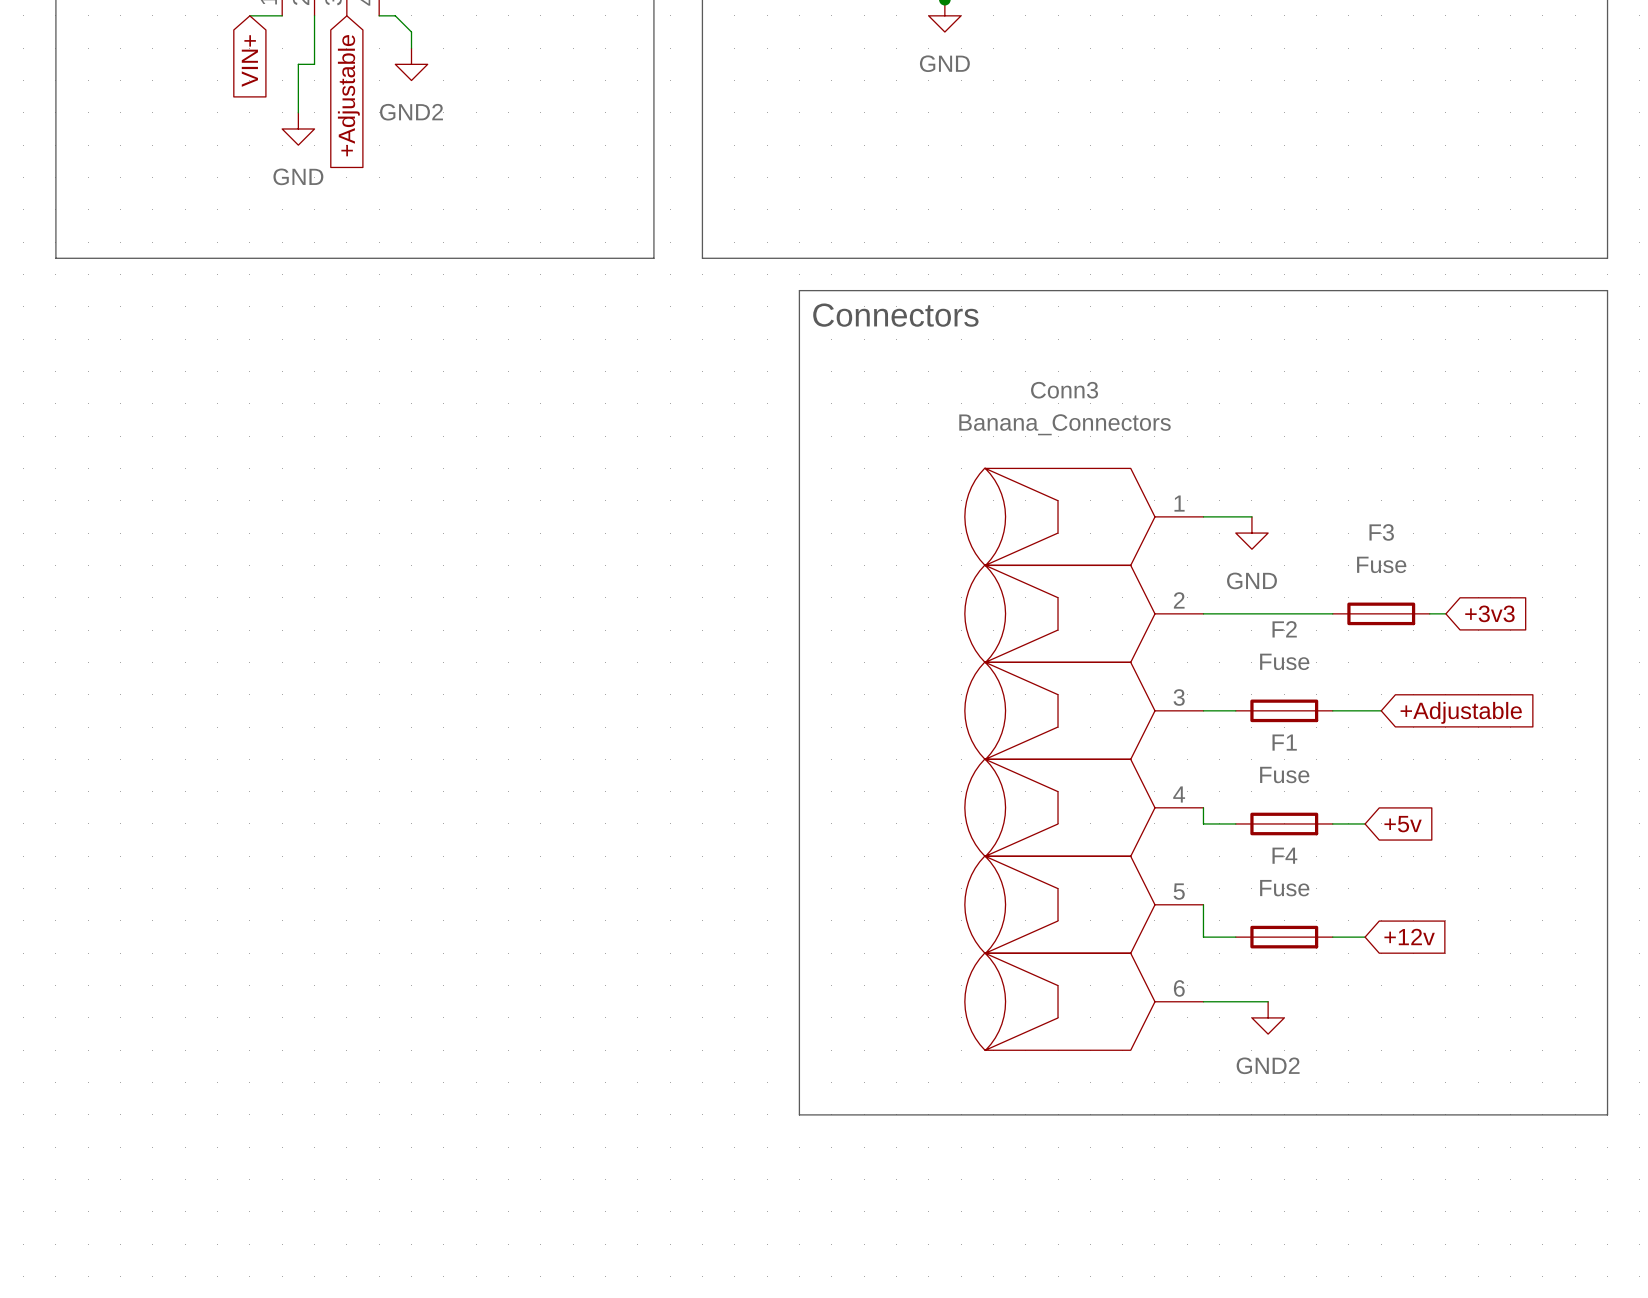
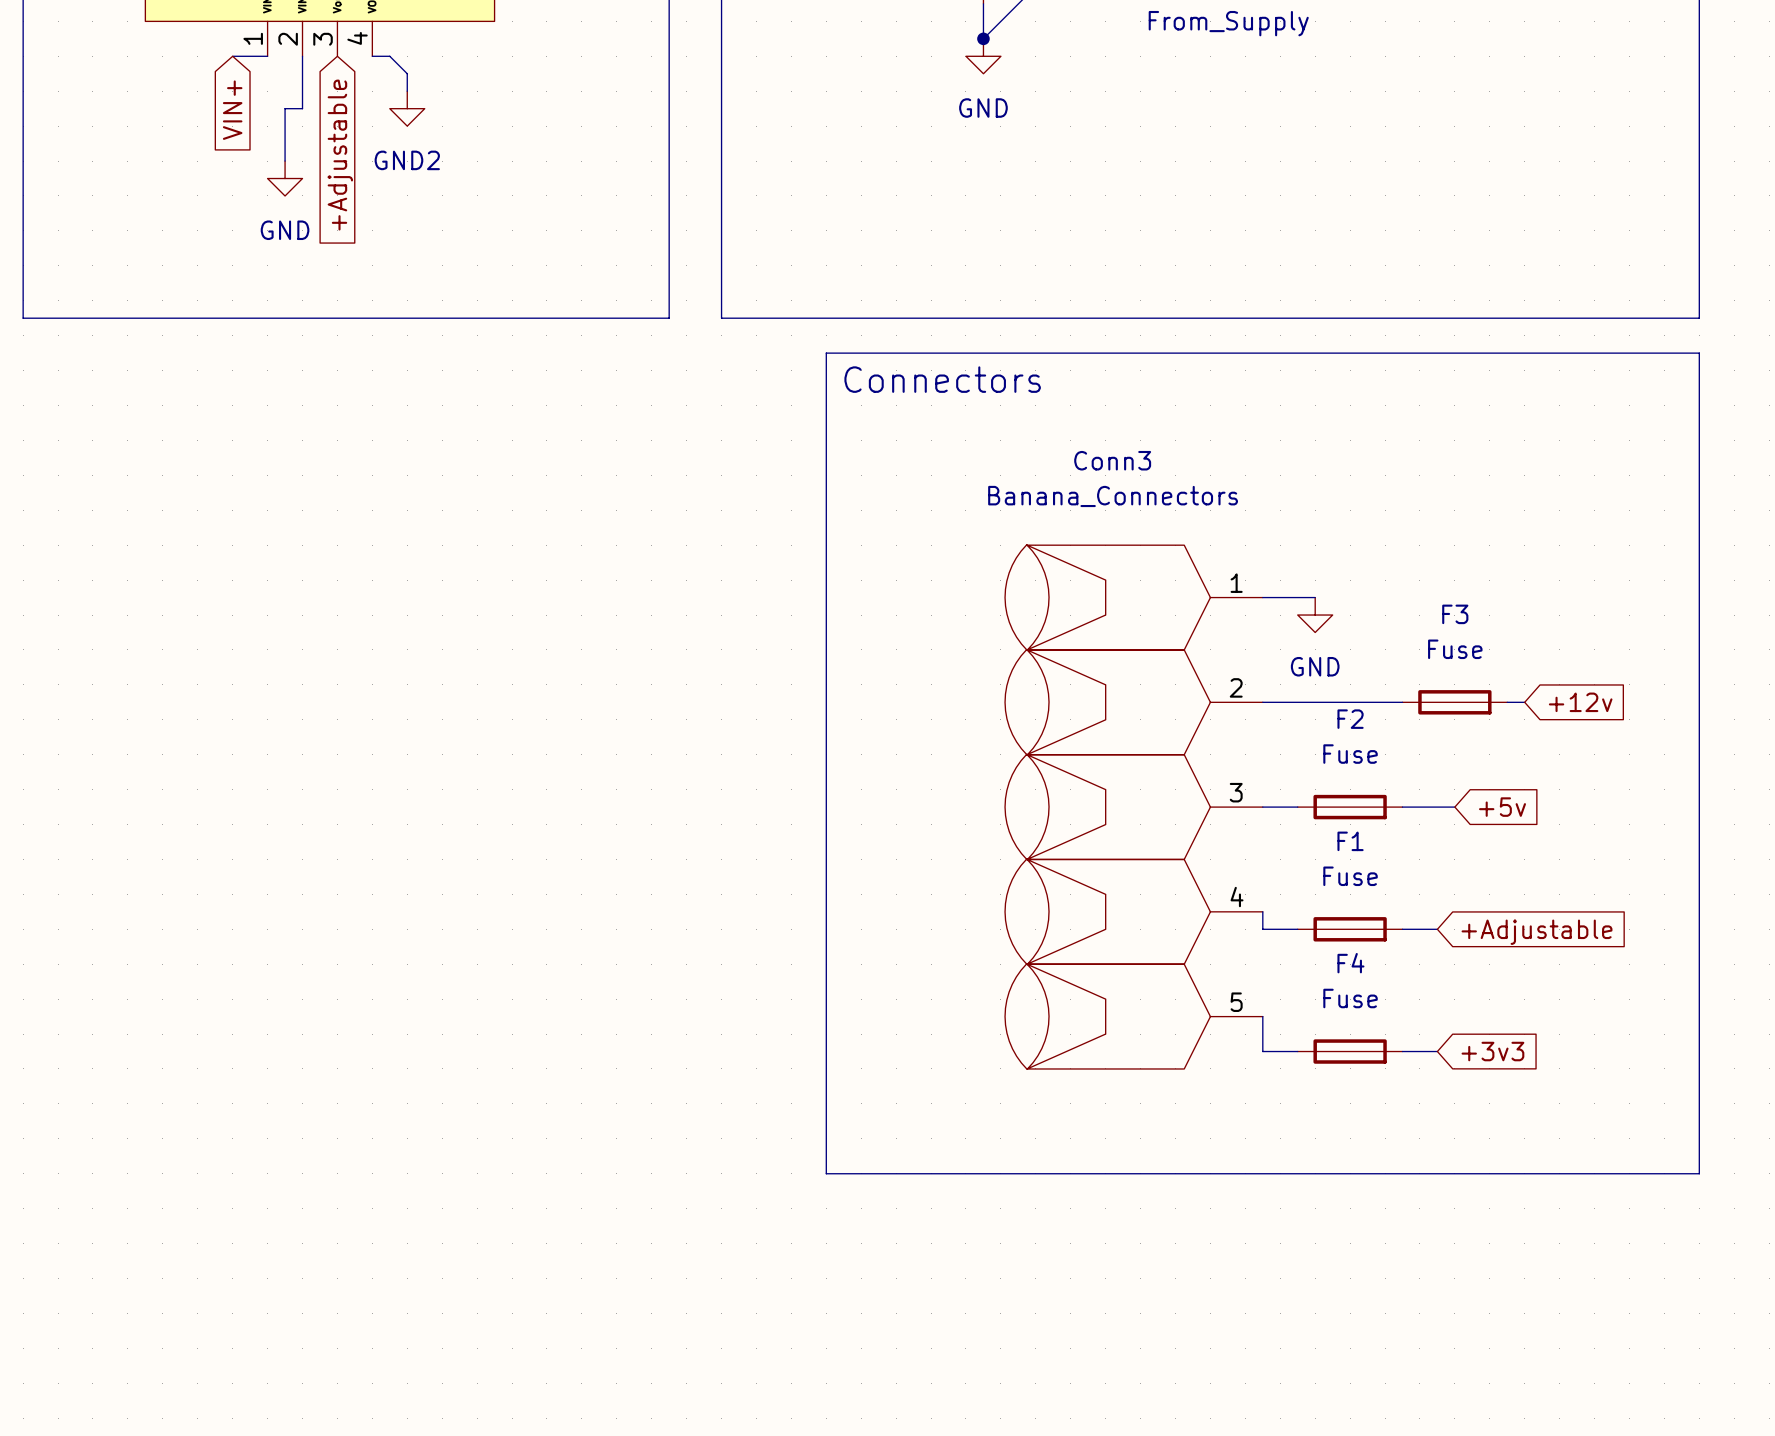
Conn3 symbol: [964, 468, 1204, 1051] -> [1005, 544, 1263, 1070]
global label: +3v3 (1489, 613) -> +12v (1580, 702)
global label: +Adjustable (1461, 712) -> +5v (1502, 807)
global label: +5v (1403, 824) -> +Adjustable (1537, 932)
global label: +12v (1409, 937) -> +3v3 (1492, 1051)
wire: (1203, 1001) (1268, 1001) -> none
power symbol: GND2 (1268, 1017) -> none
line: (799, 1050) (799, 1114) (1607, 1114) (1607, 1050) -> (826, 1173) (1699, 1173)

